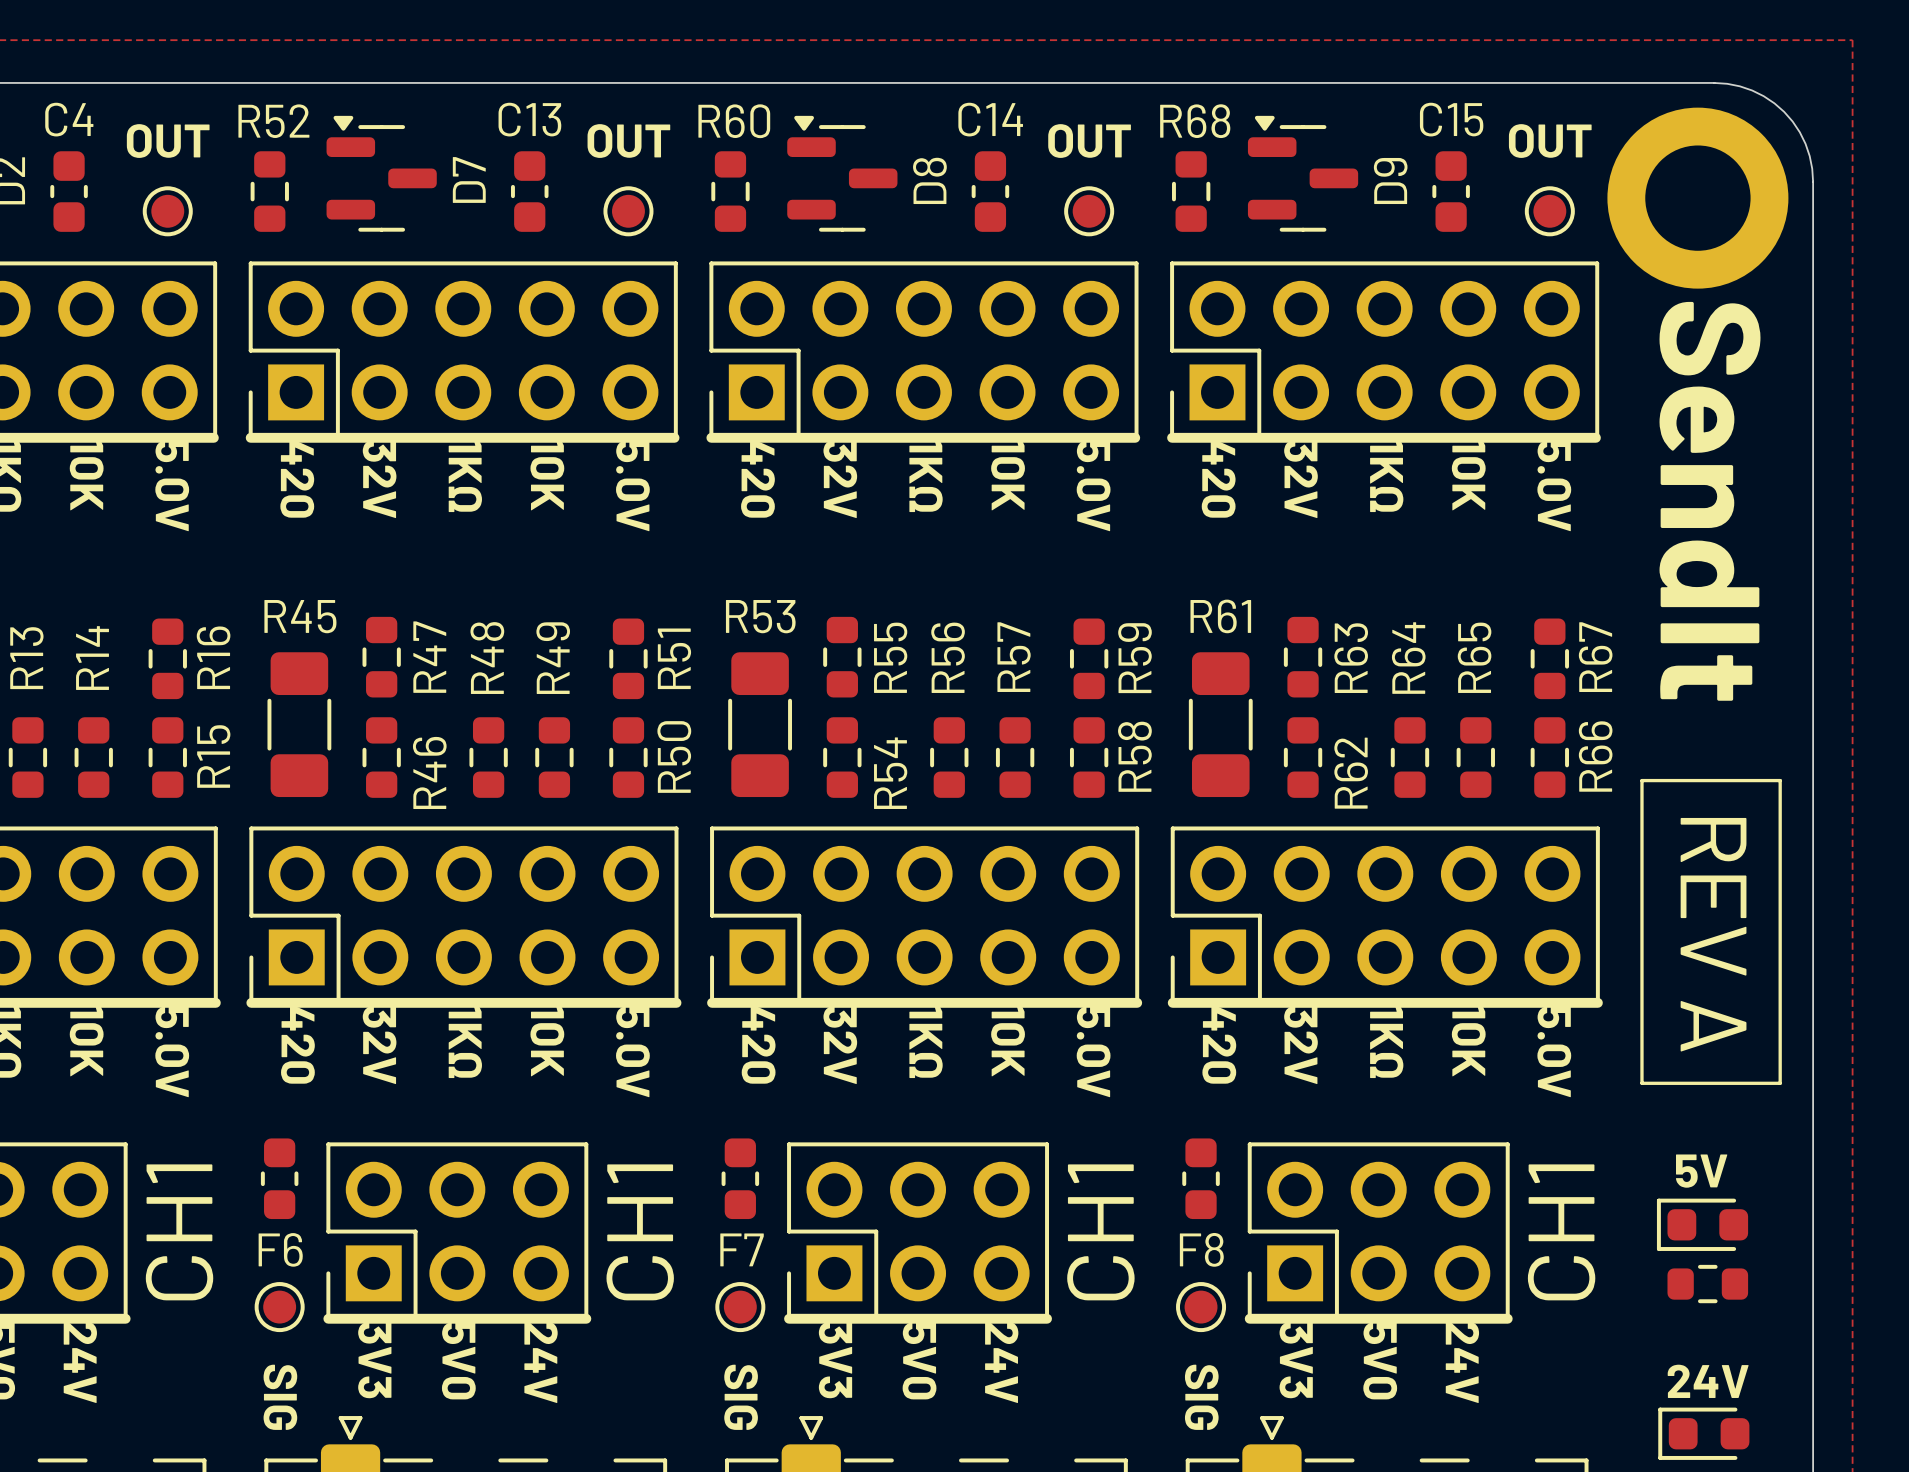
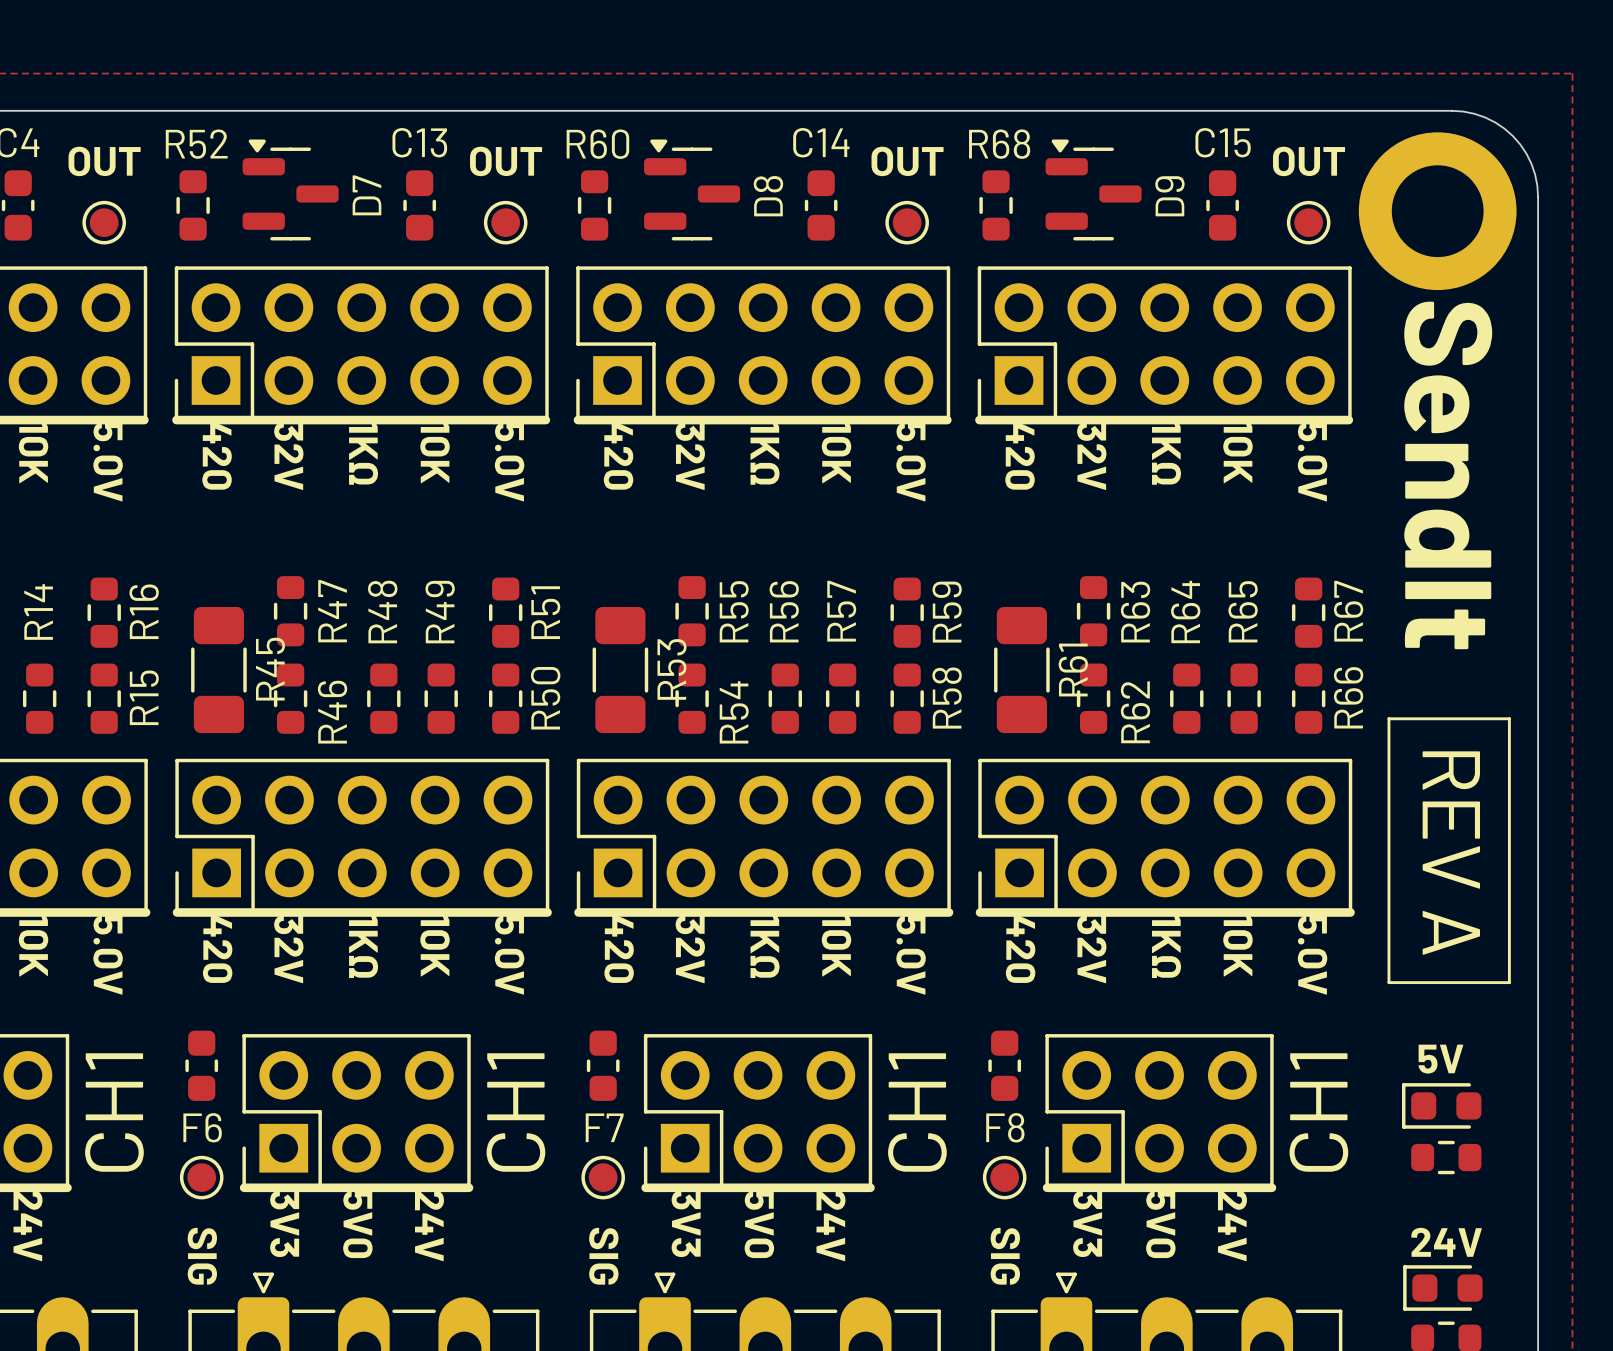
R45 name rotation: 0° (300, 616) -> 90° counterclockwise (270, 669)
R45 name position: R45 (300, 616) -> R45 (270, 669)
R53 name rotation: 0° (760, 616) -> 90° counterclockwise (671, 669)
R53 name position: R53 (760, 616) -> R53 (671, 669)
R61 name rotation: 0° (1220, 616) -> 90° counterclockwise (1073, 670)
R61 name position: R61 (1220, 616) -> R61 (1073, 670)

